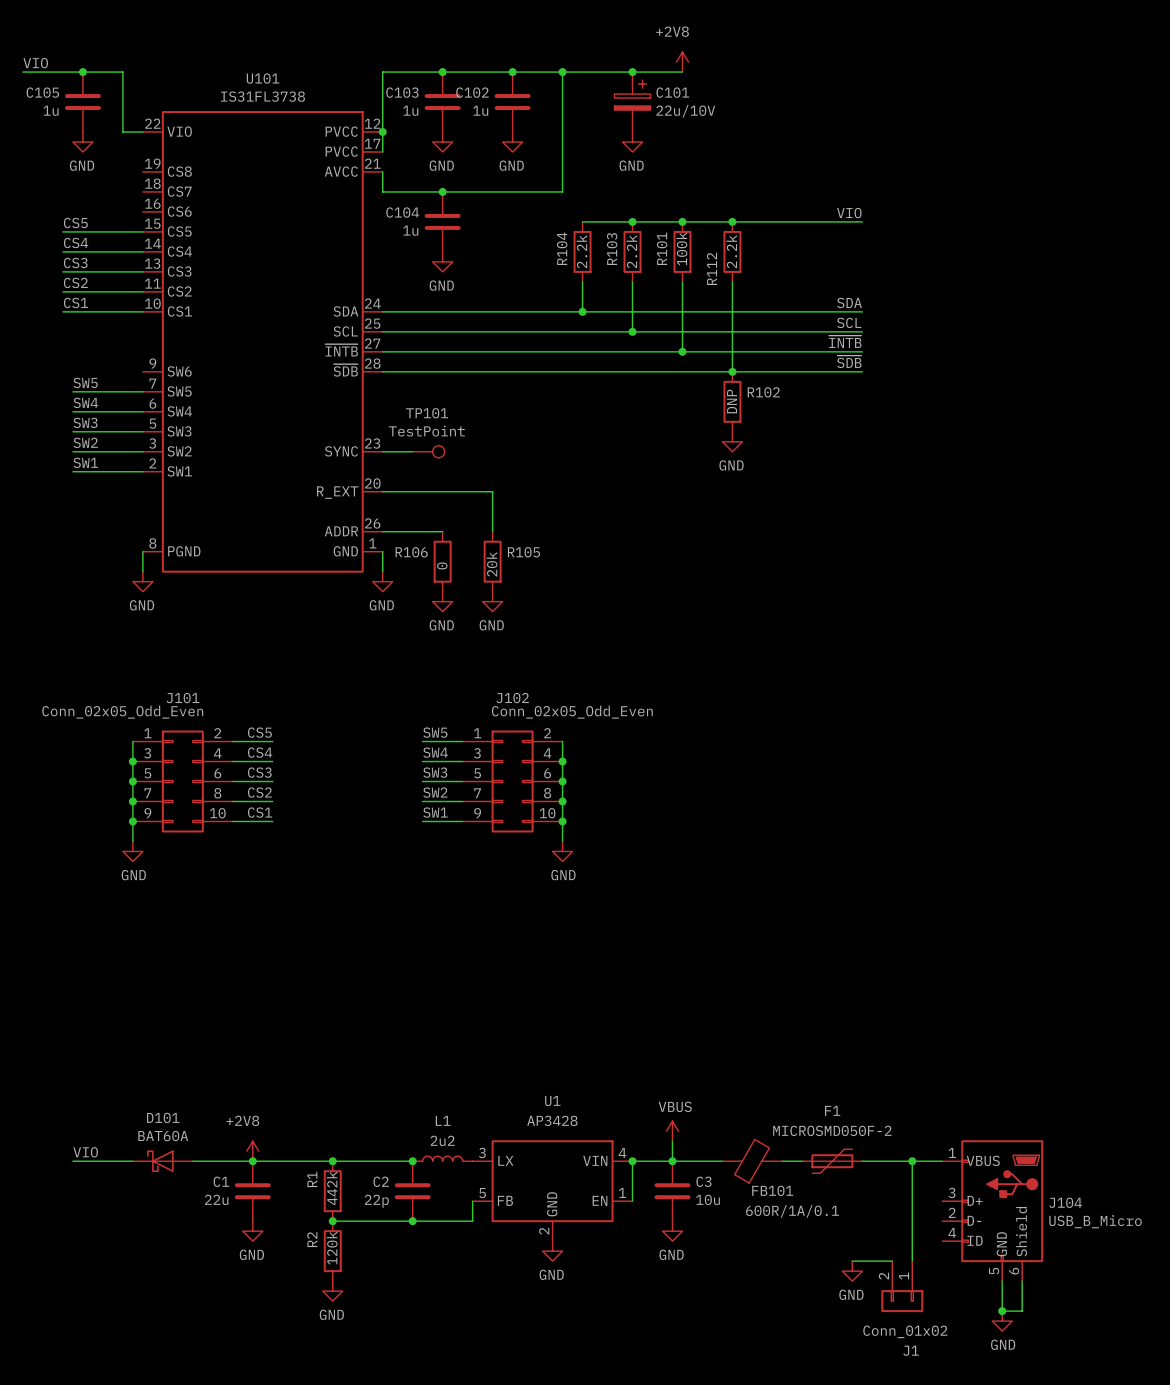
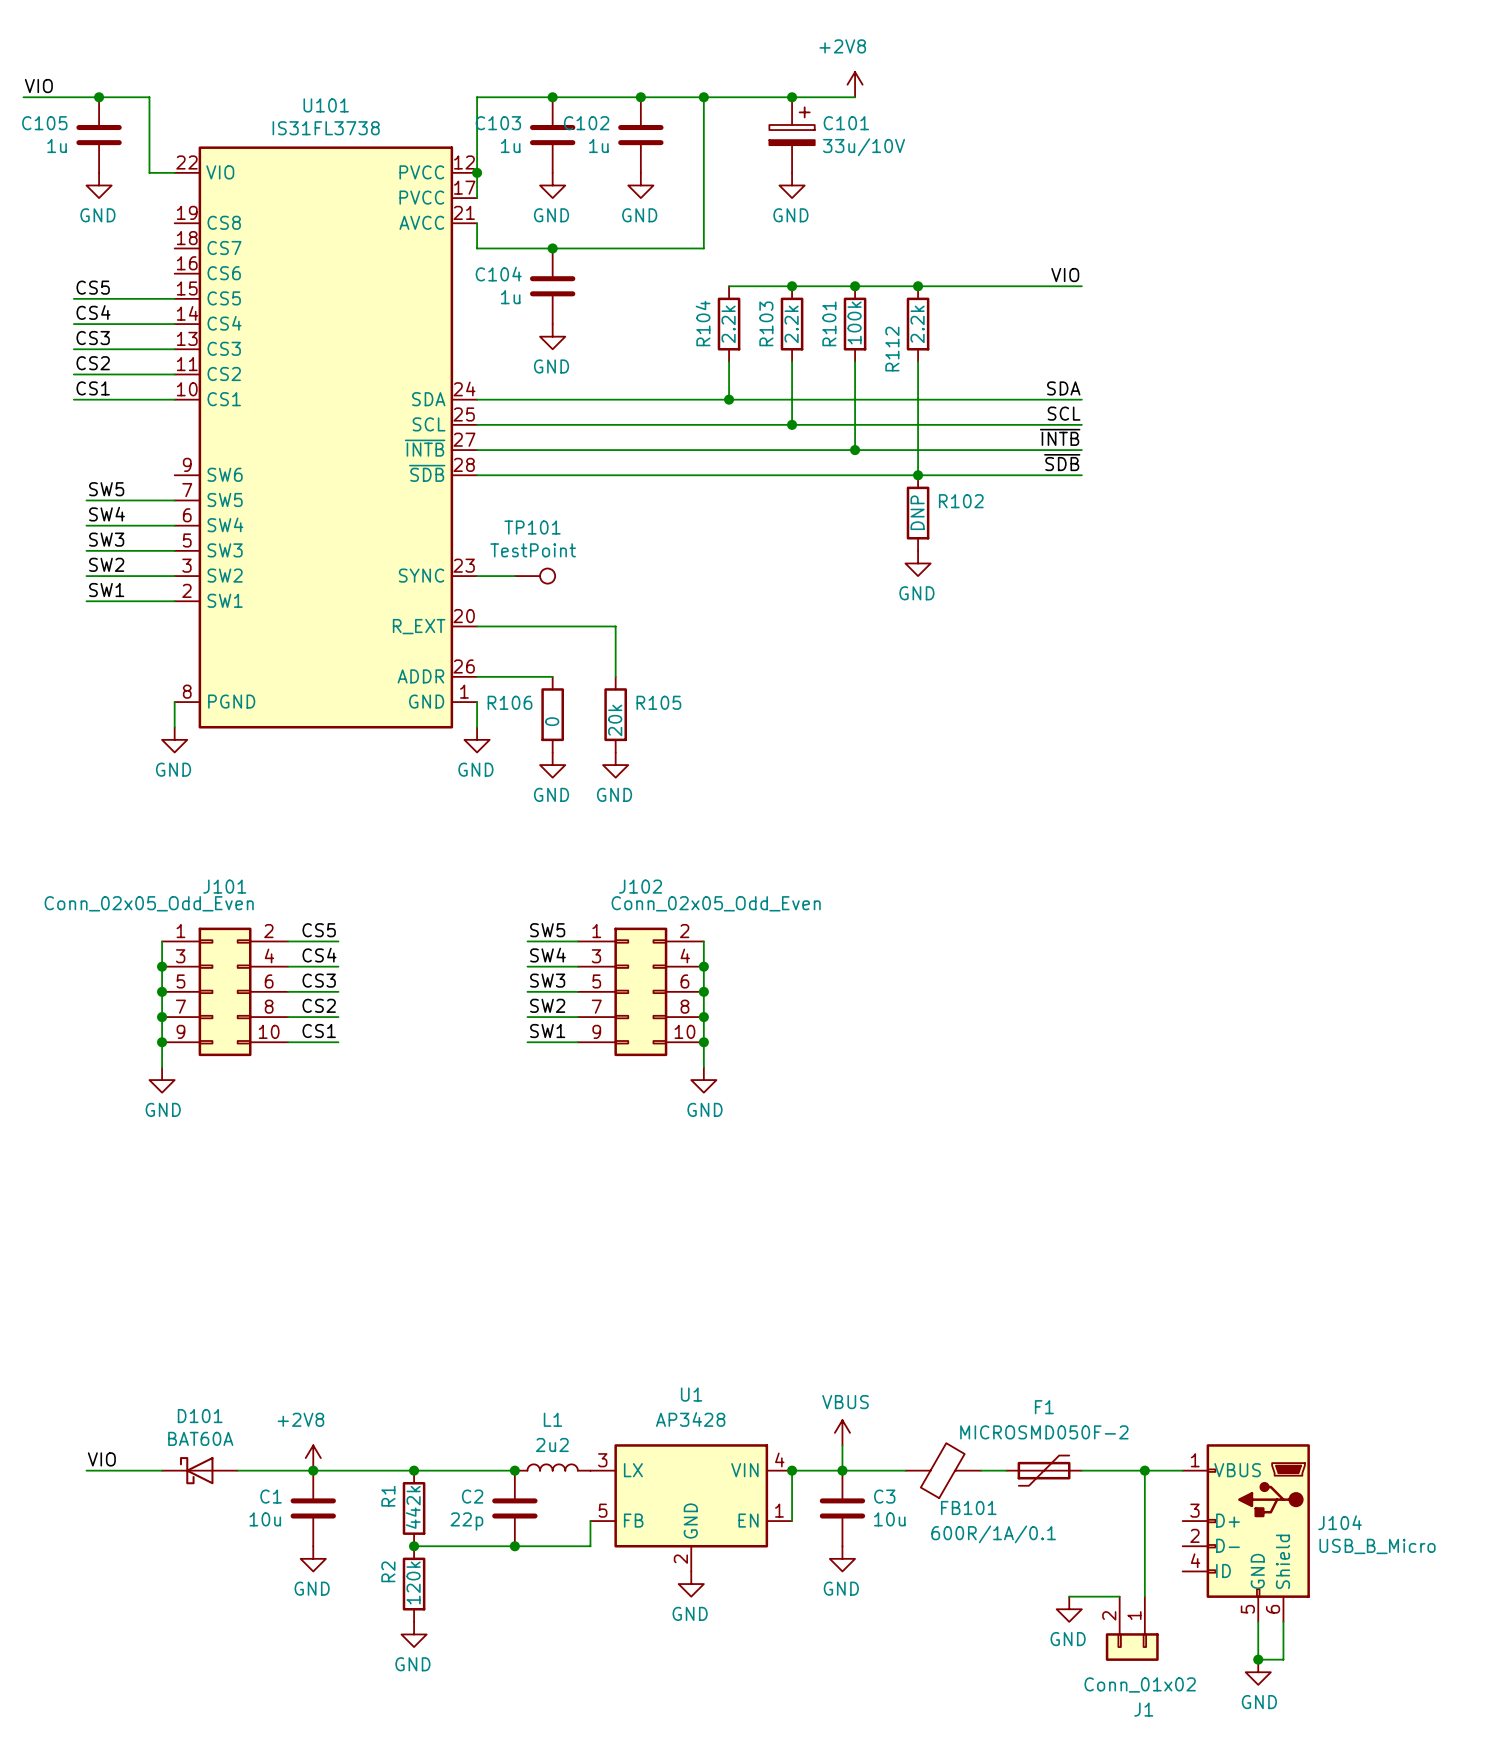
C101 value: 22u/10V (685, 111) -> 33u/10V (864, 147)
C1 value: 22u (216, 1199) -> 10u (265, 1519)

